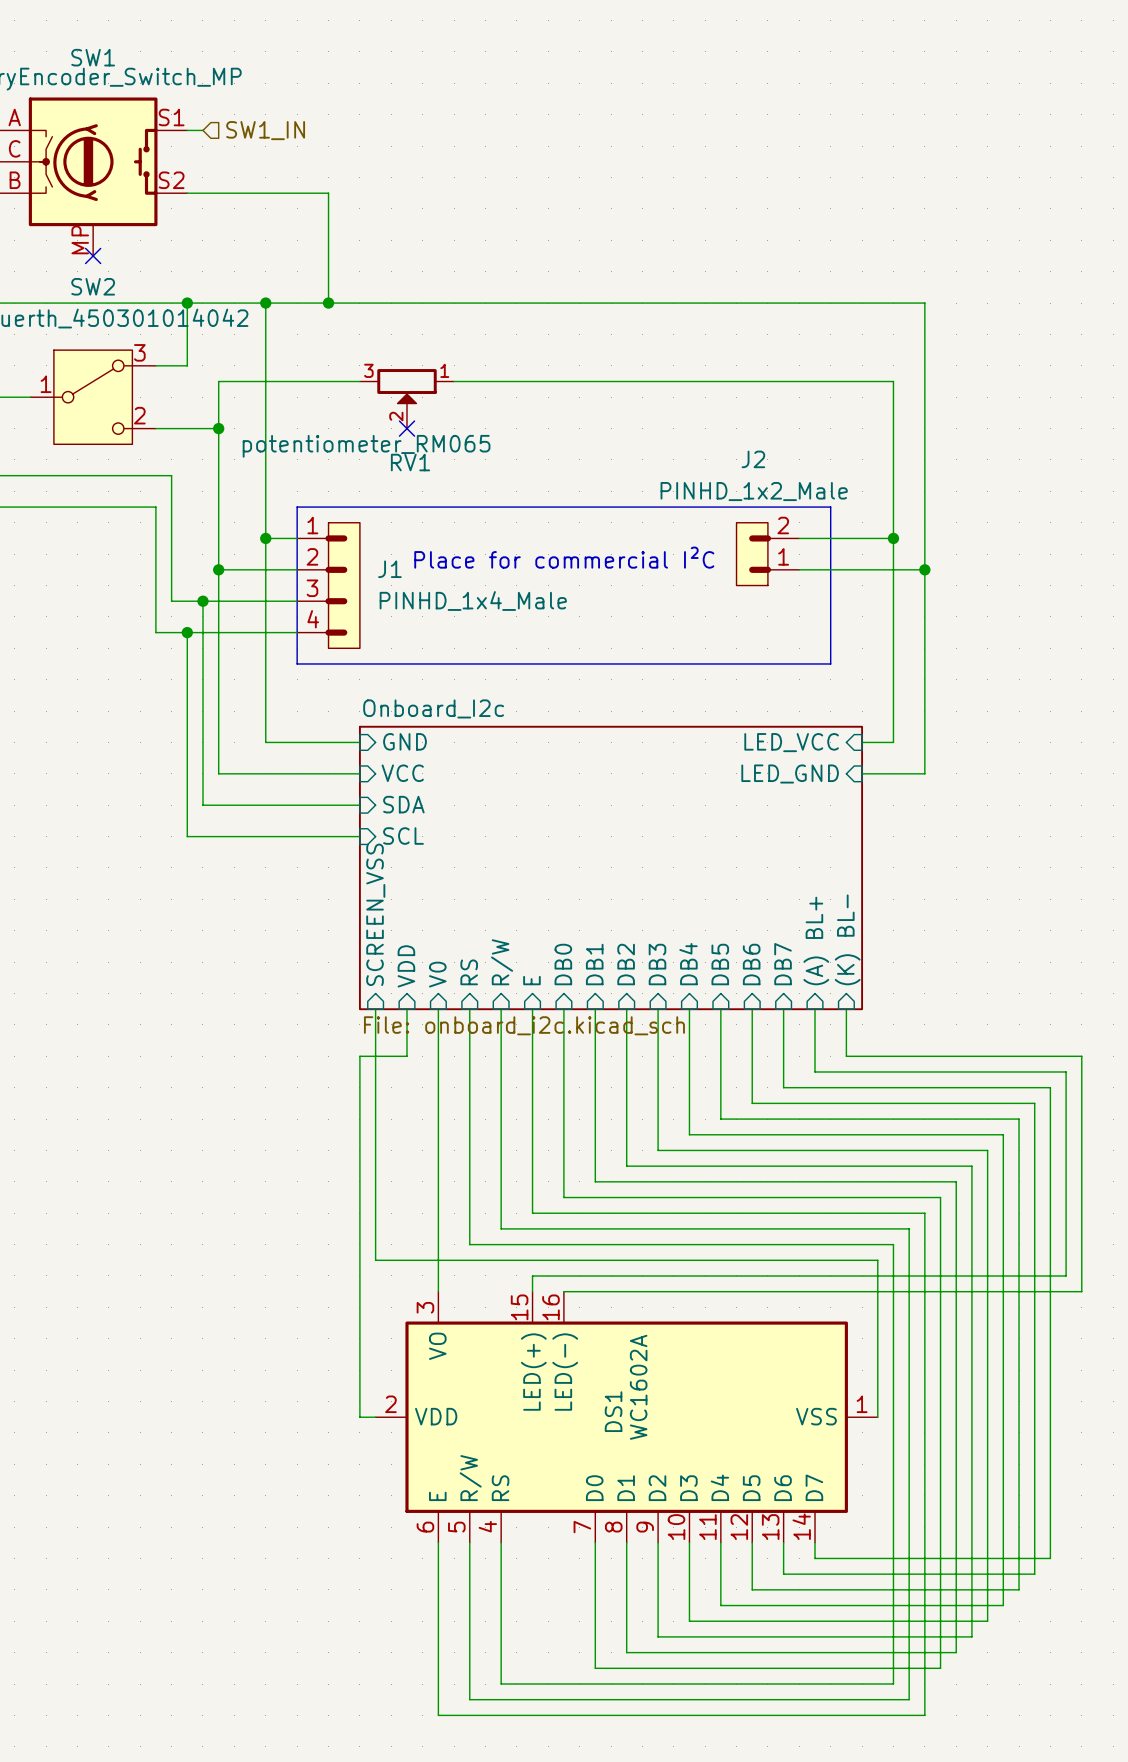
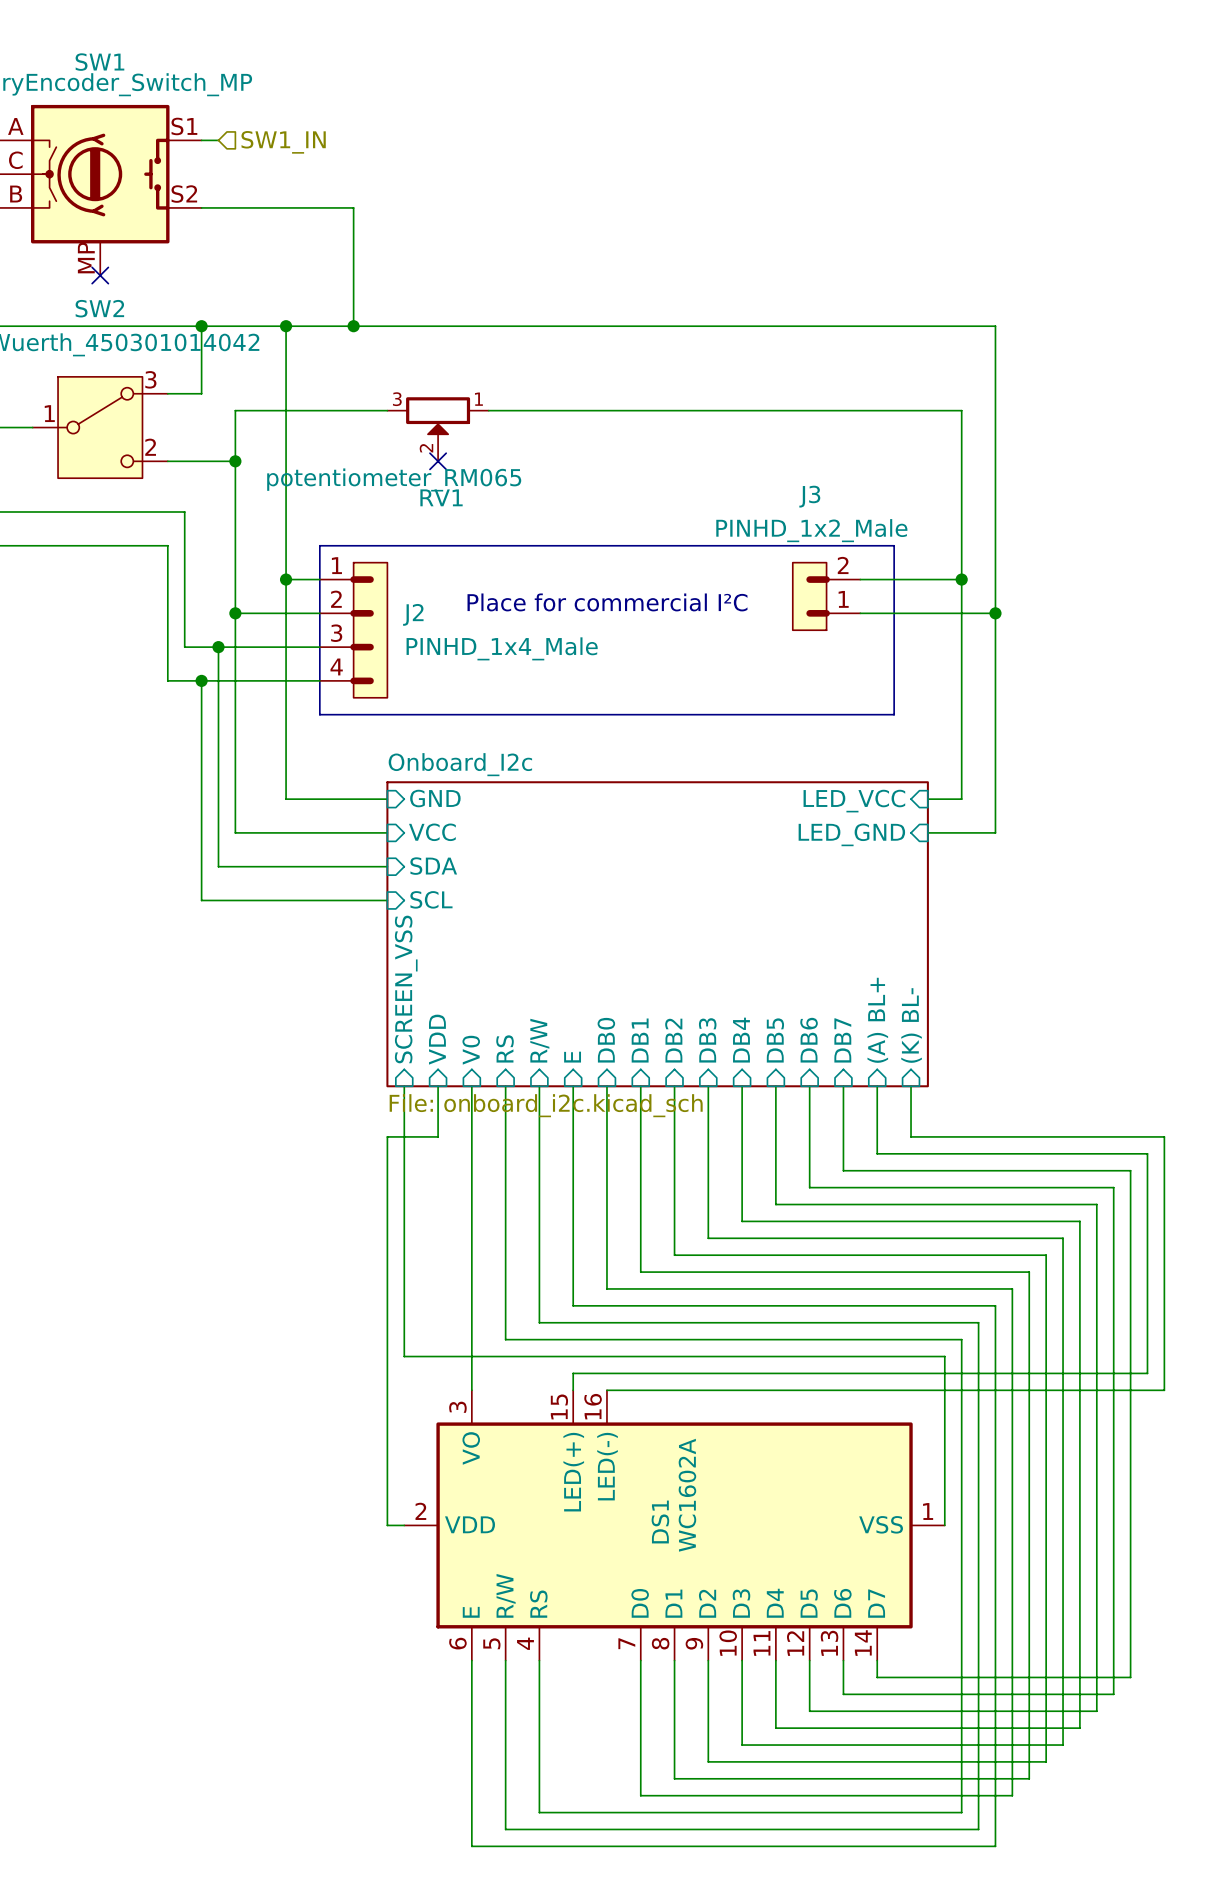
J2 name: J2 (753, 459) -> J3 (809, 496)
J1 name: J1 (389, 569) -> J2 (413, 614)

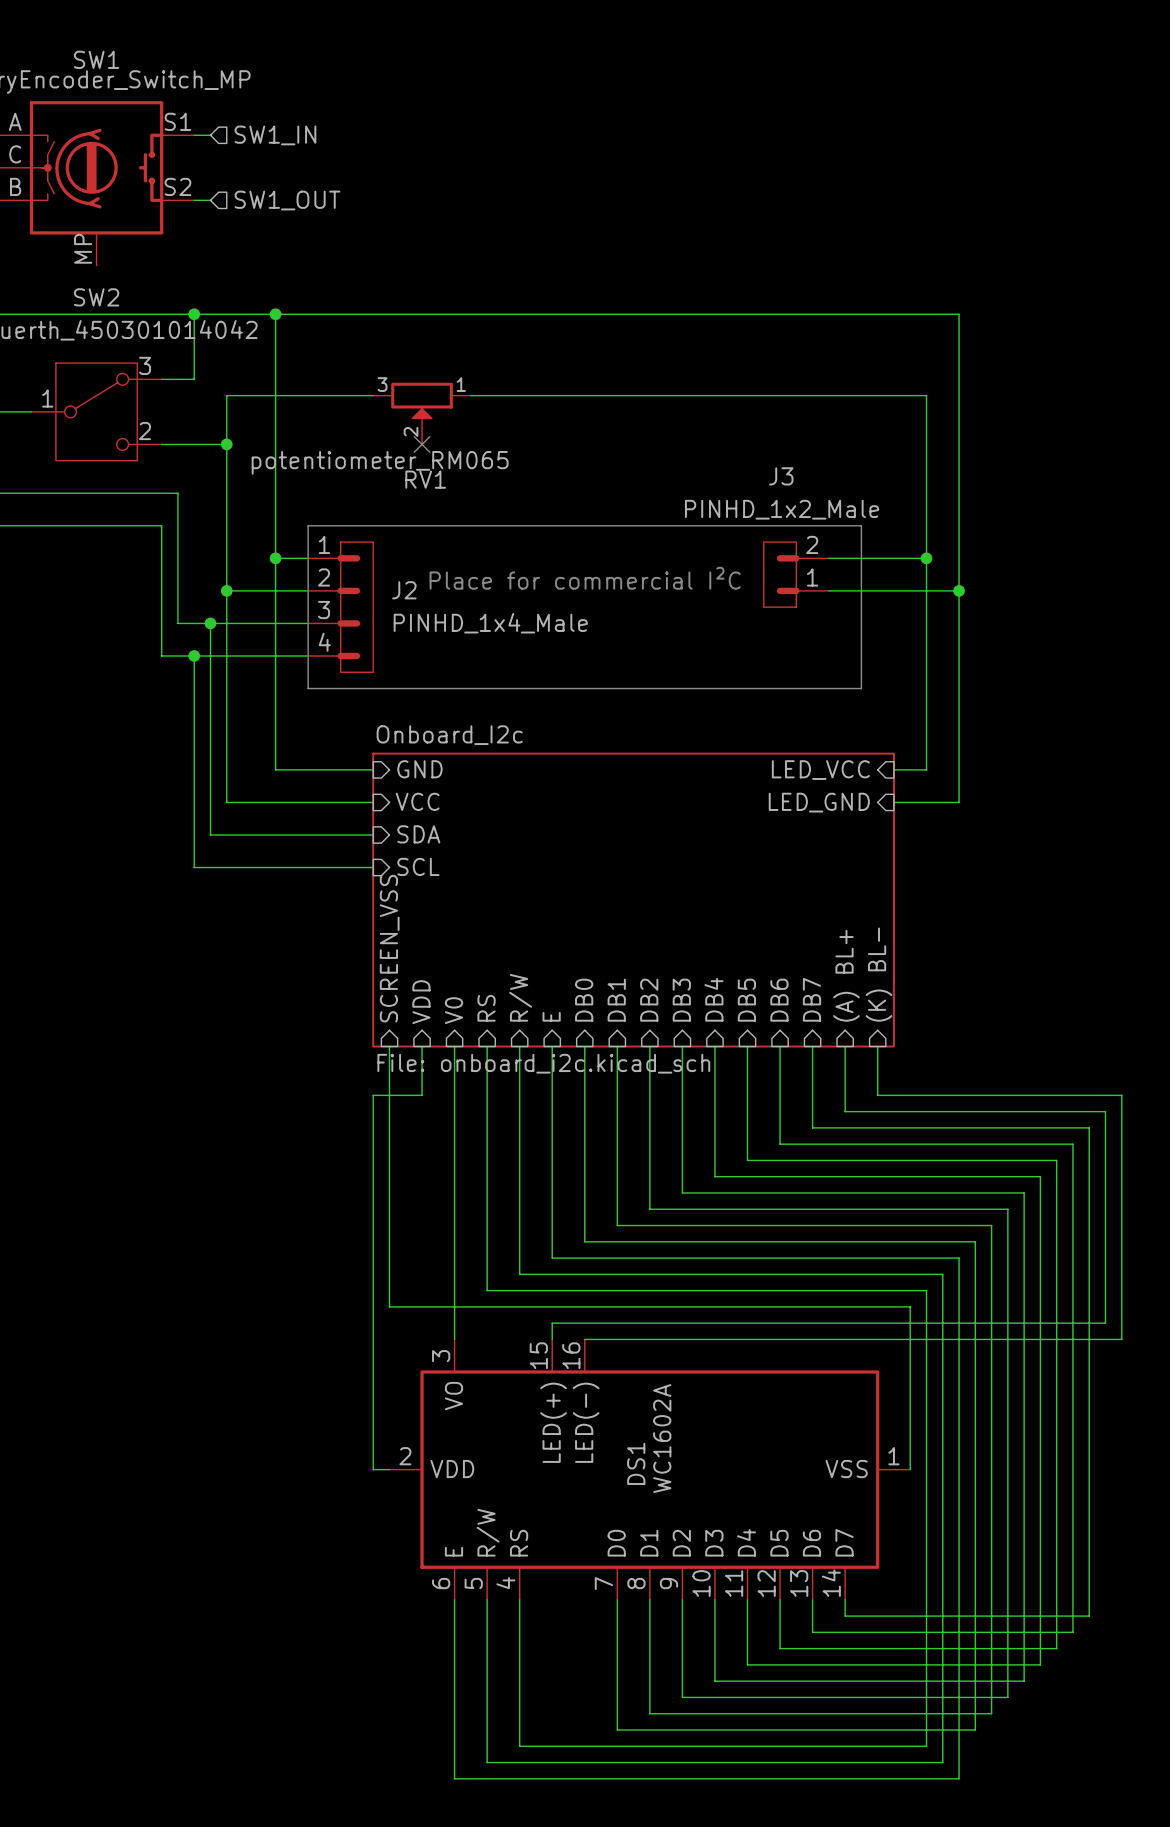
wire: (218, 207) (353, 207) (353, 326) -> none
hierarchical label: none -> SW1_OUT (287, 200)
no-connect mark: (100, 275) -> none
junction: (353, 326) -> none

